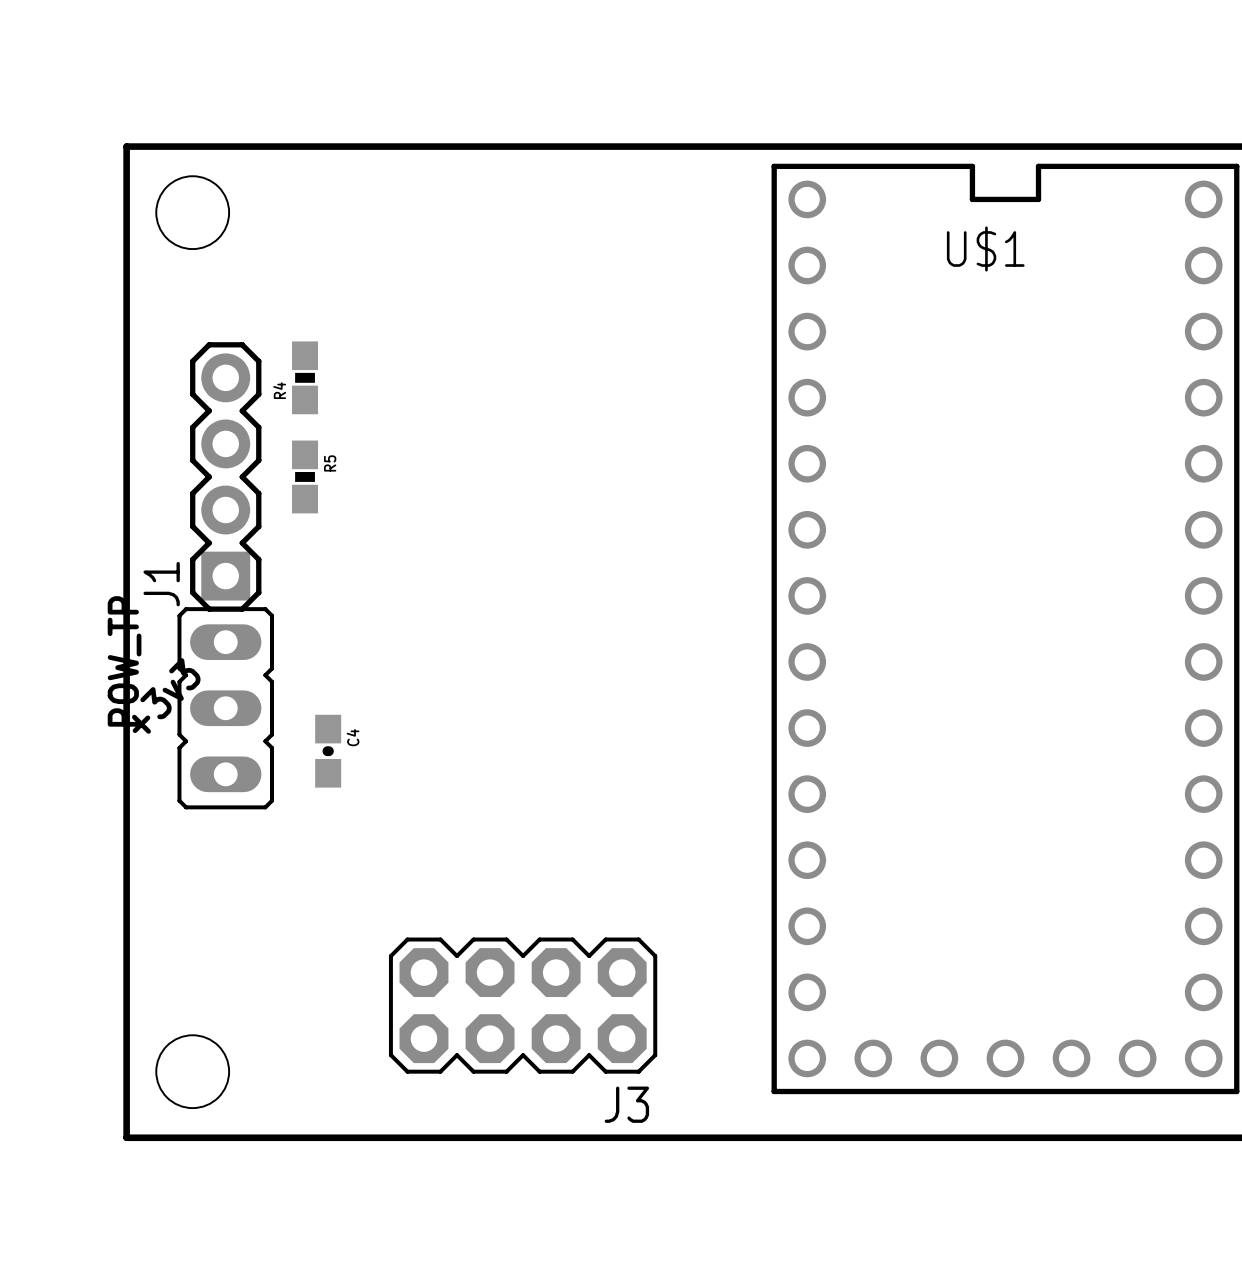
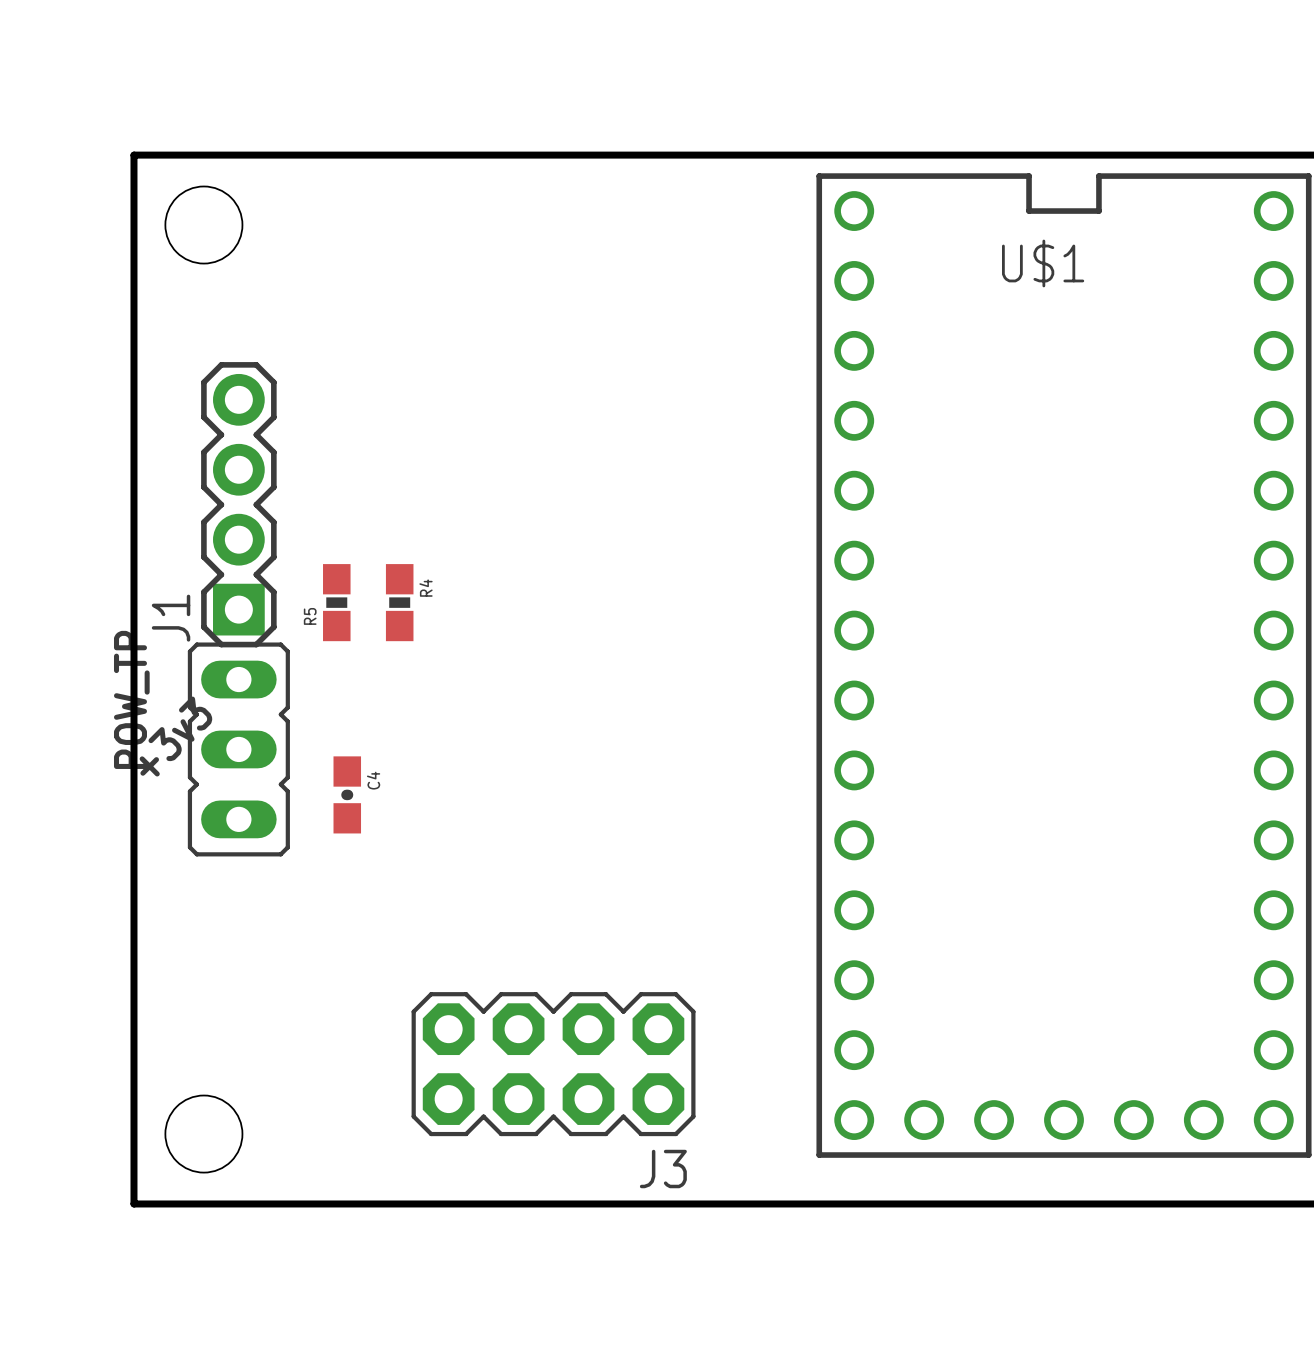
R4 position: (305, 377) -> (399, 602)
R4 name position: R4 (279, 390) -> R4 (426, 588)
R5 name position: R5 (330, 463) -> R5 (310, 616)
R5 position: (305, 476) -> (336, 602)

